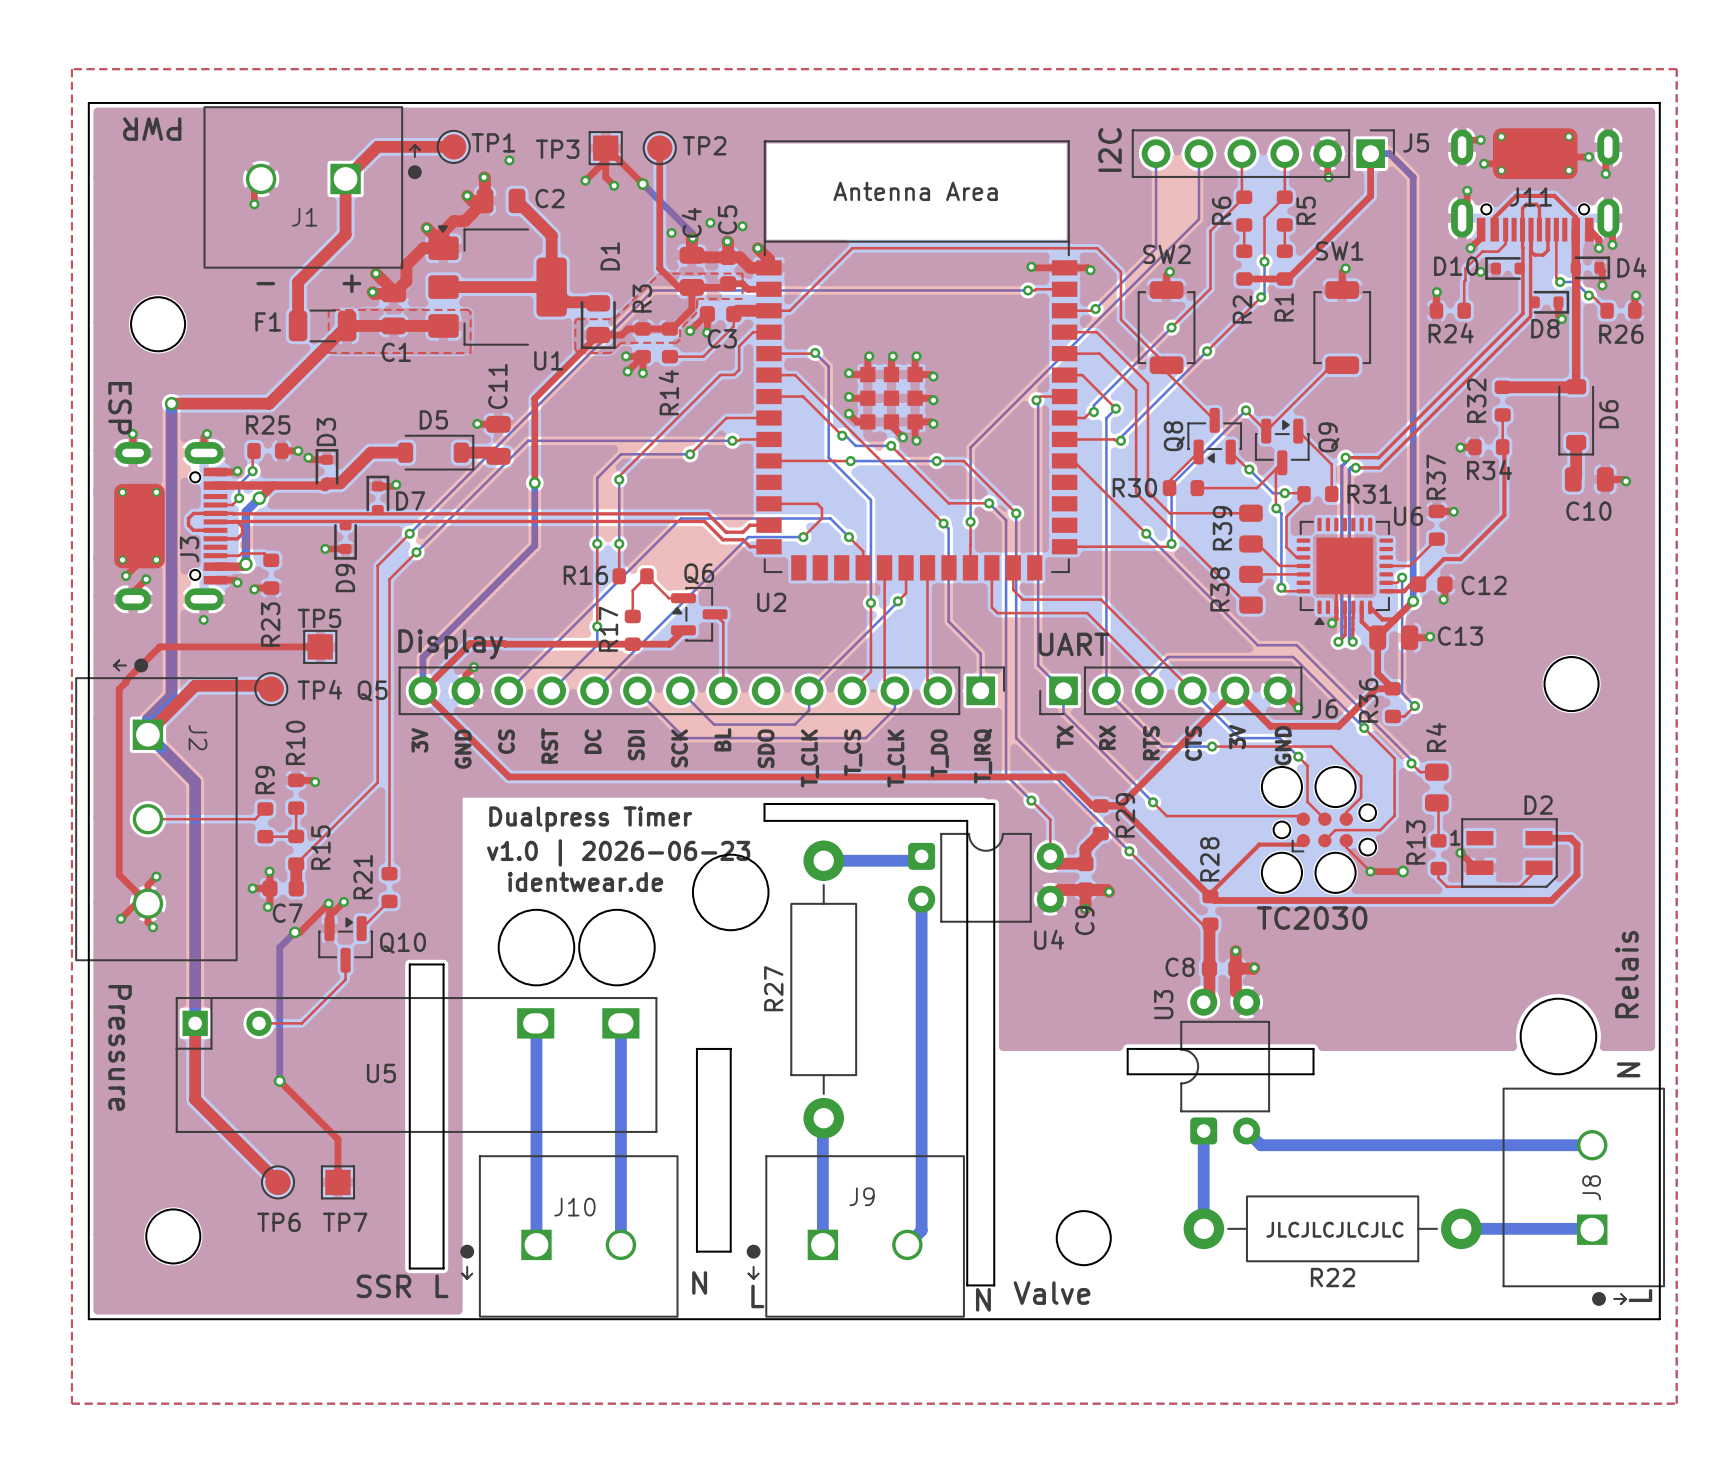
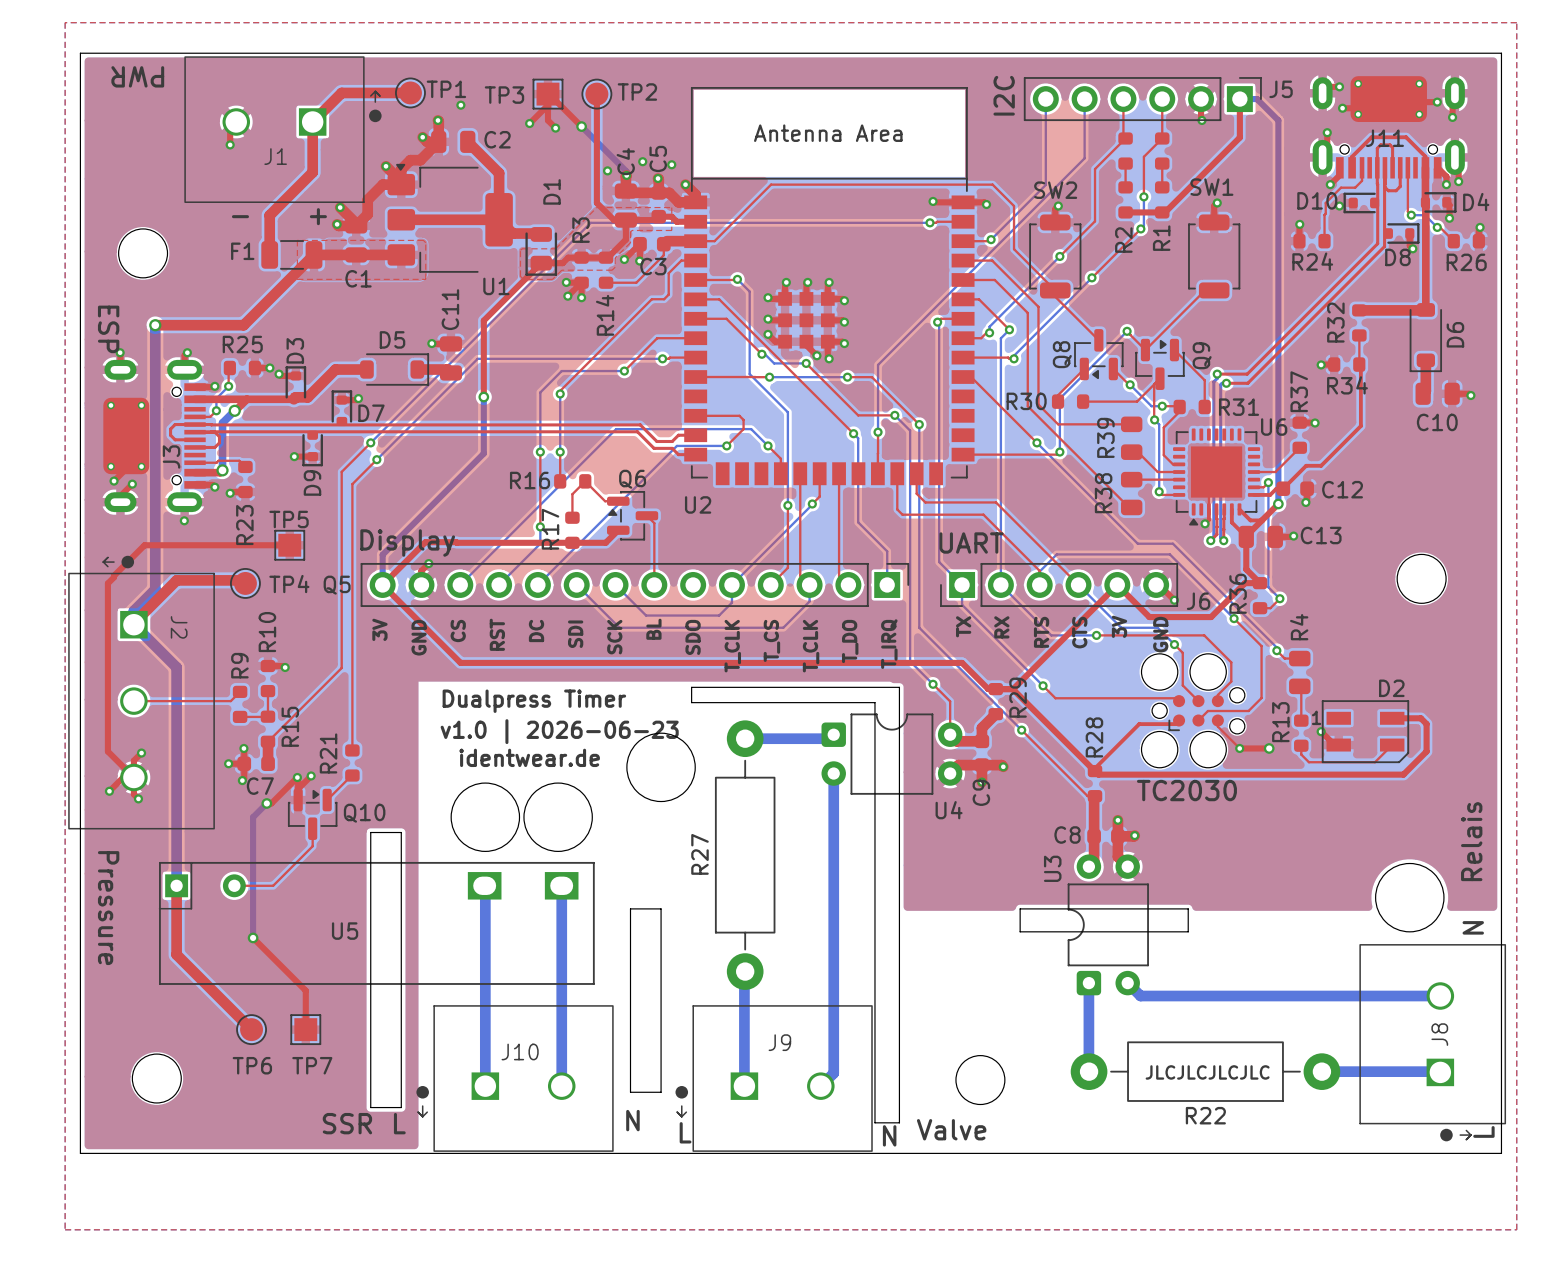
R6 name: R6 (1221, 210) -> none
R5 name: R5 (1306, 210) -> none

